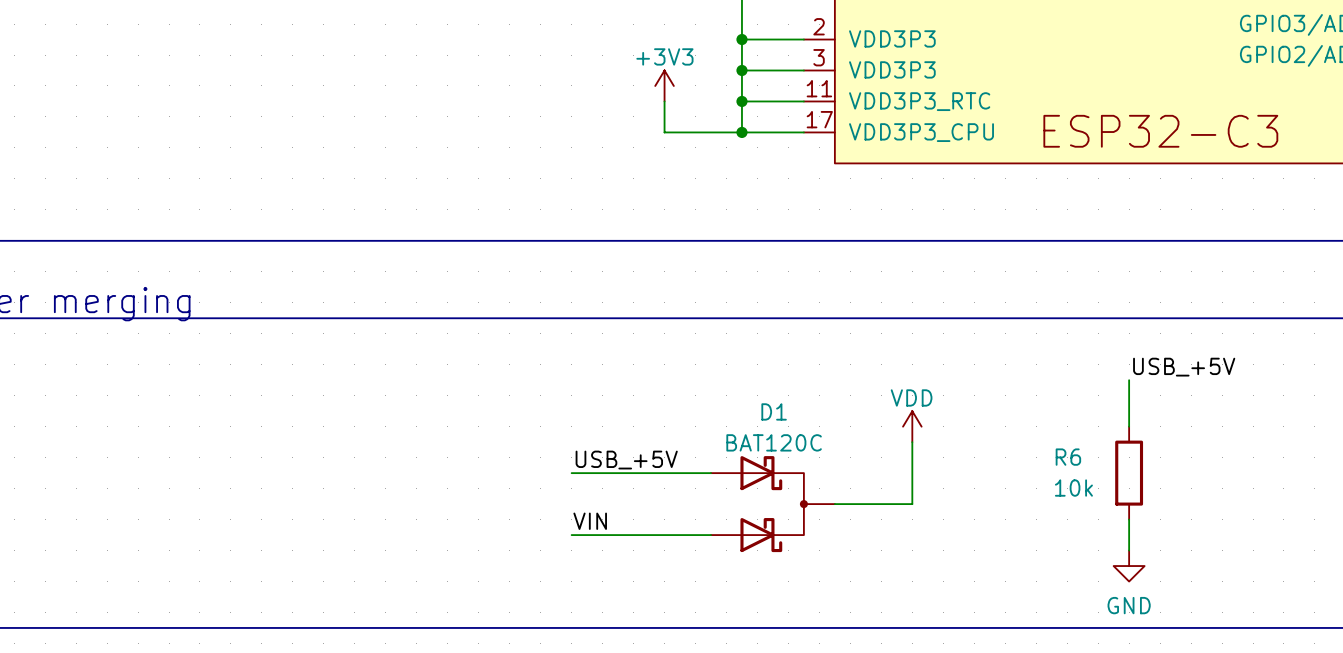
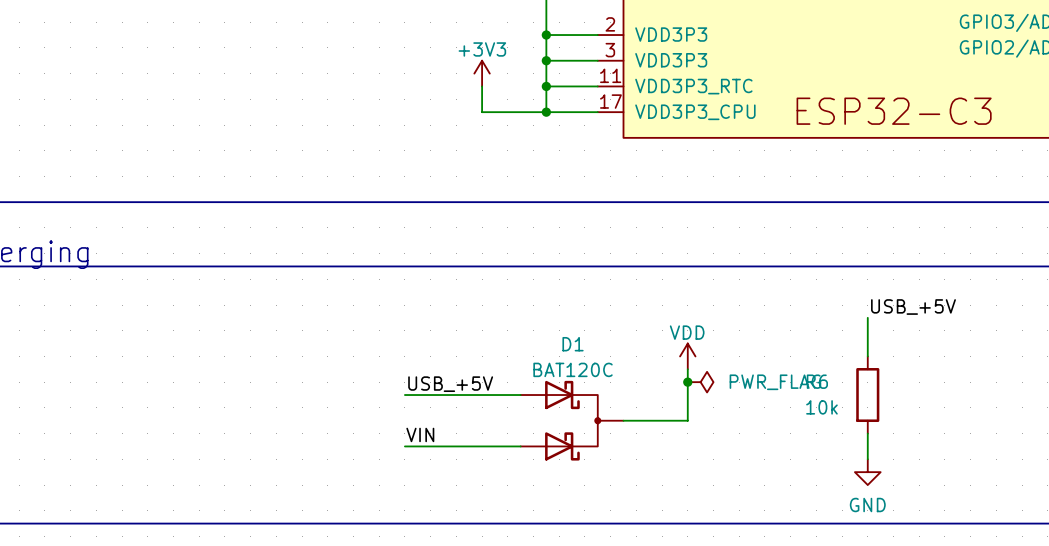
junction: none -> (687, 382)
power symbol: none -> PWR_FLAG (700, 382)

